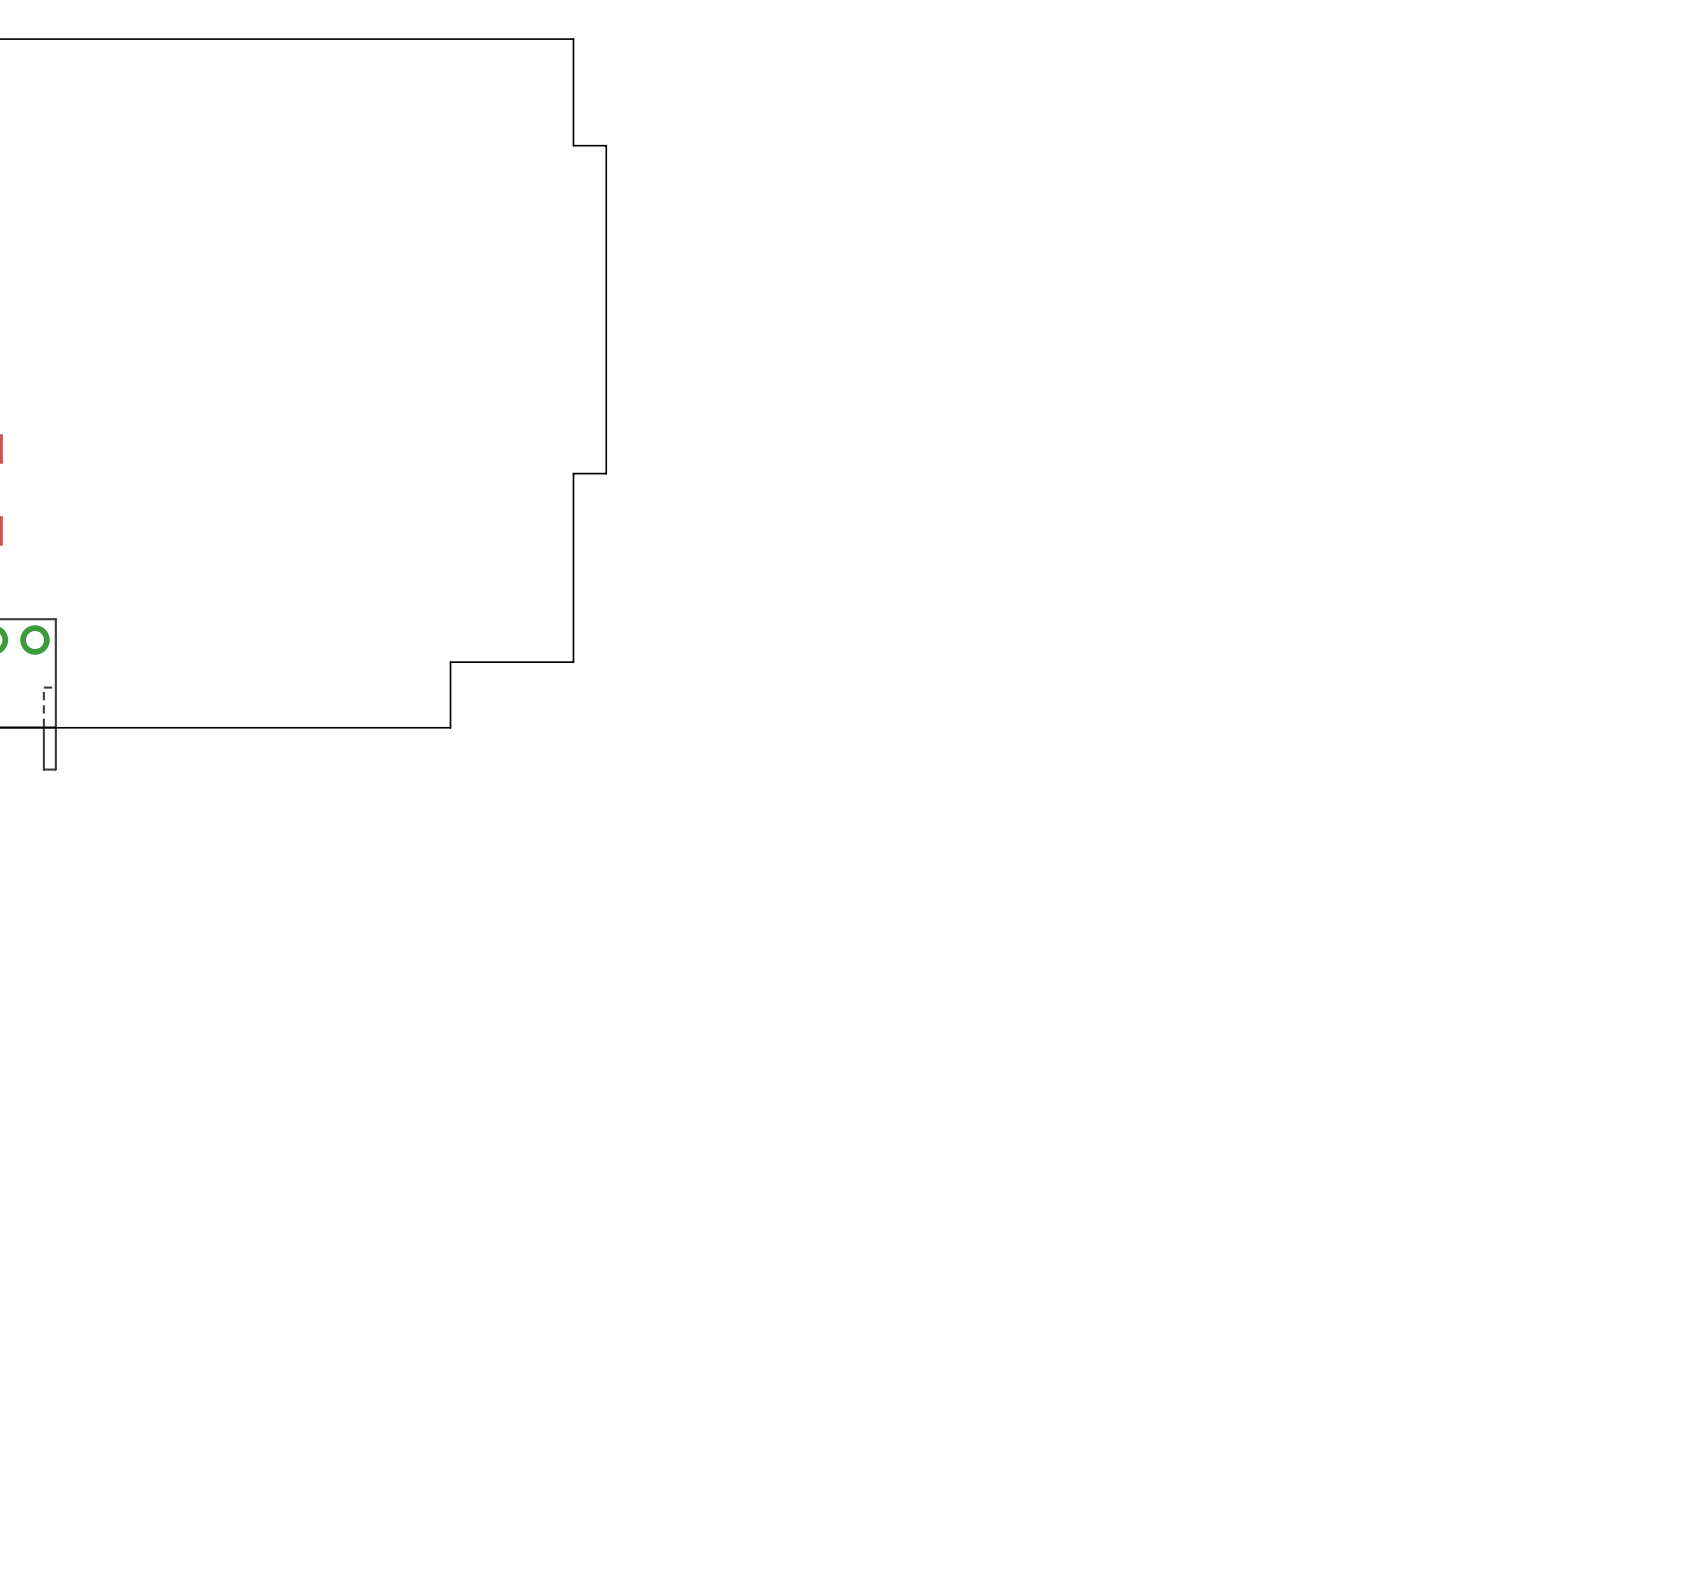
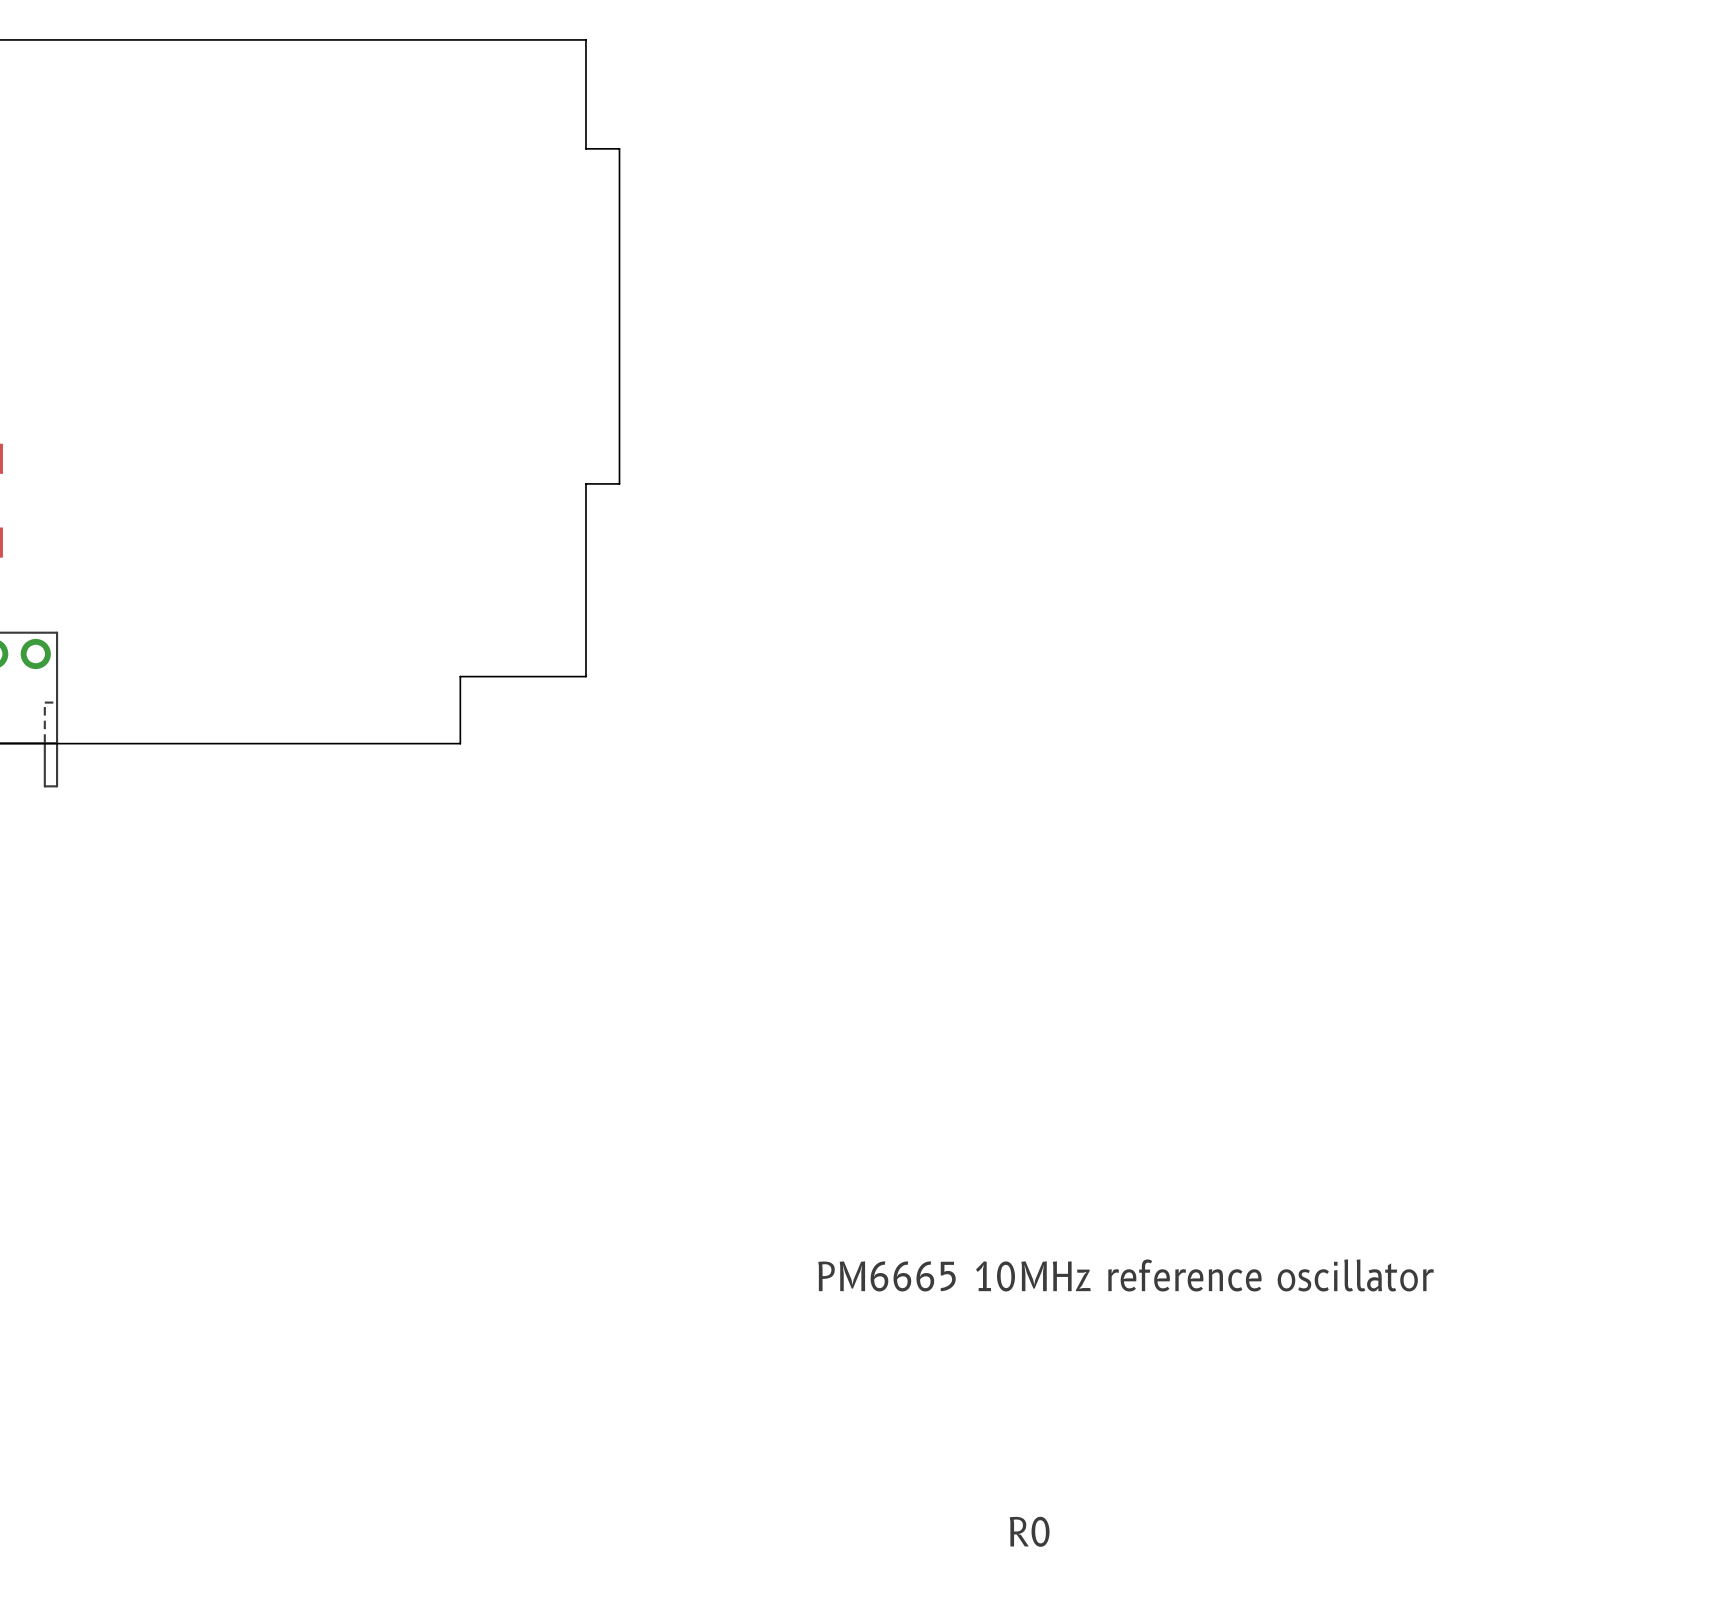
drawing: none -> [818, 1259, 1434, 1547]

